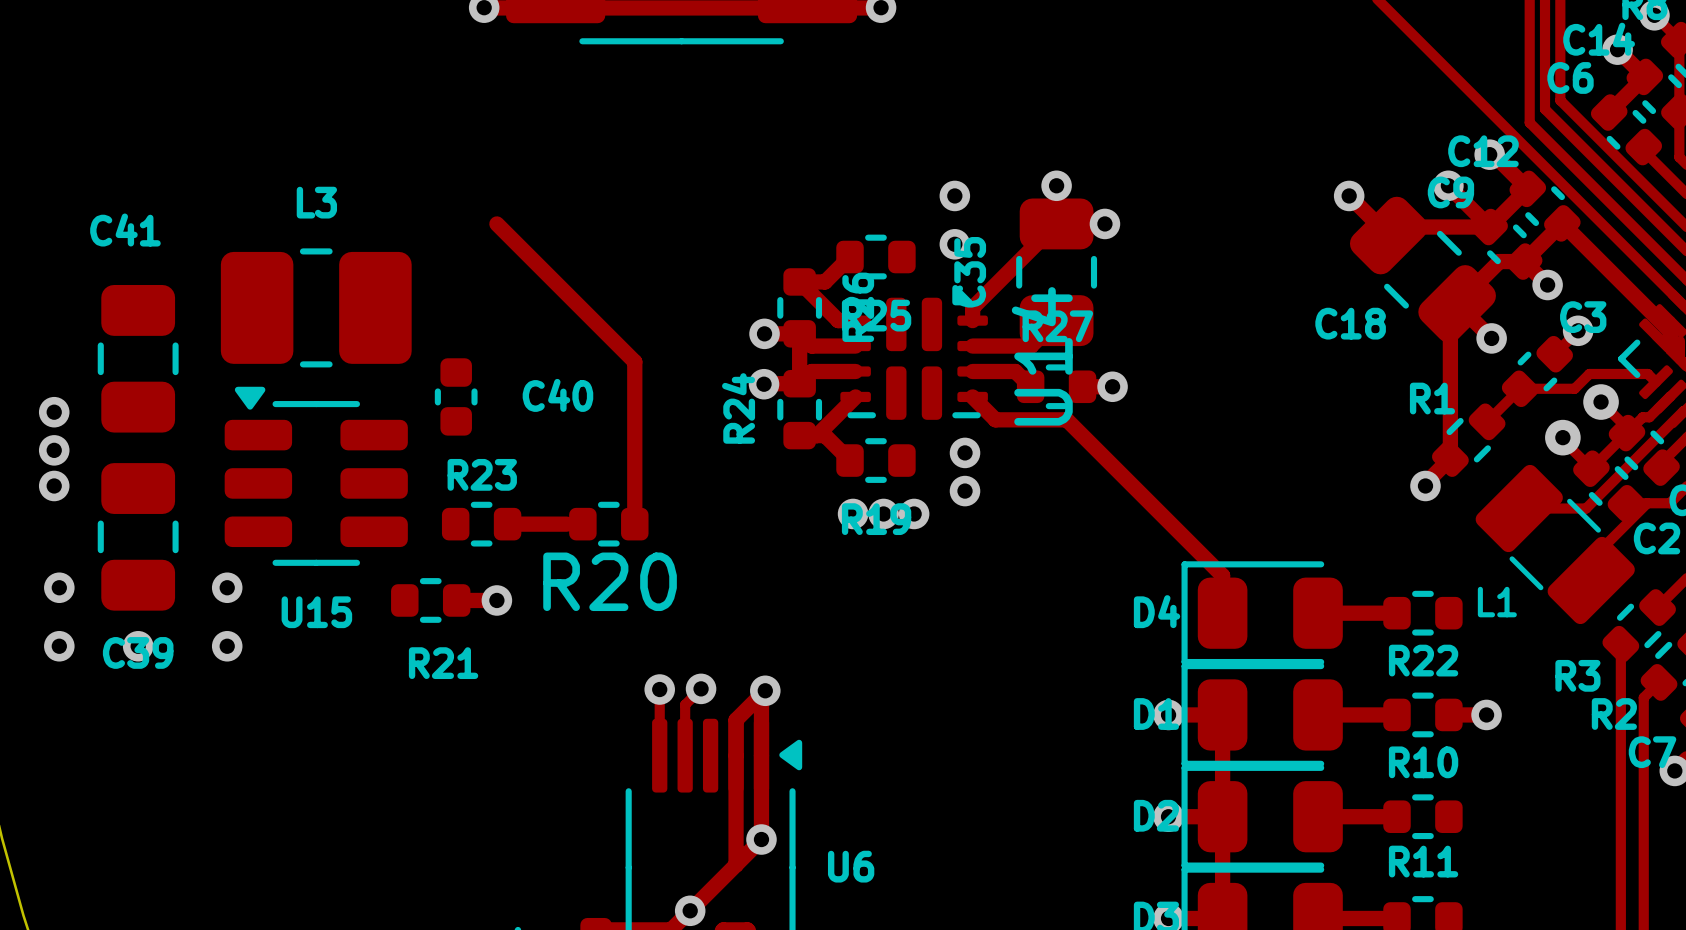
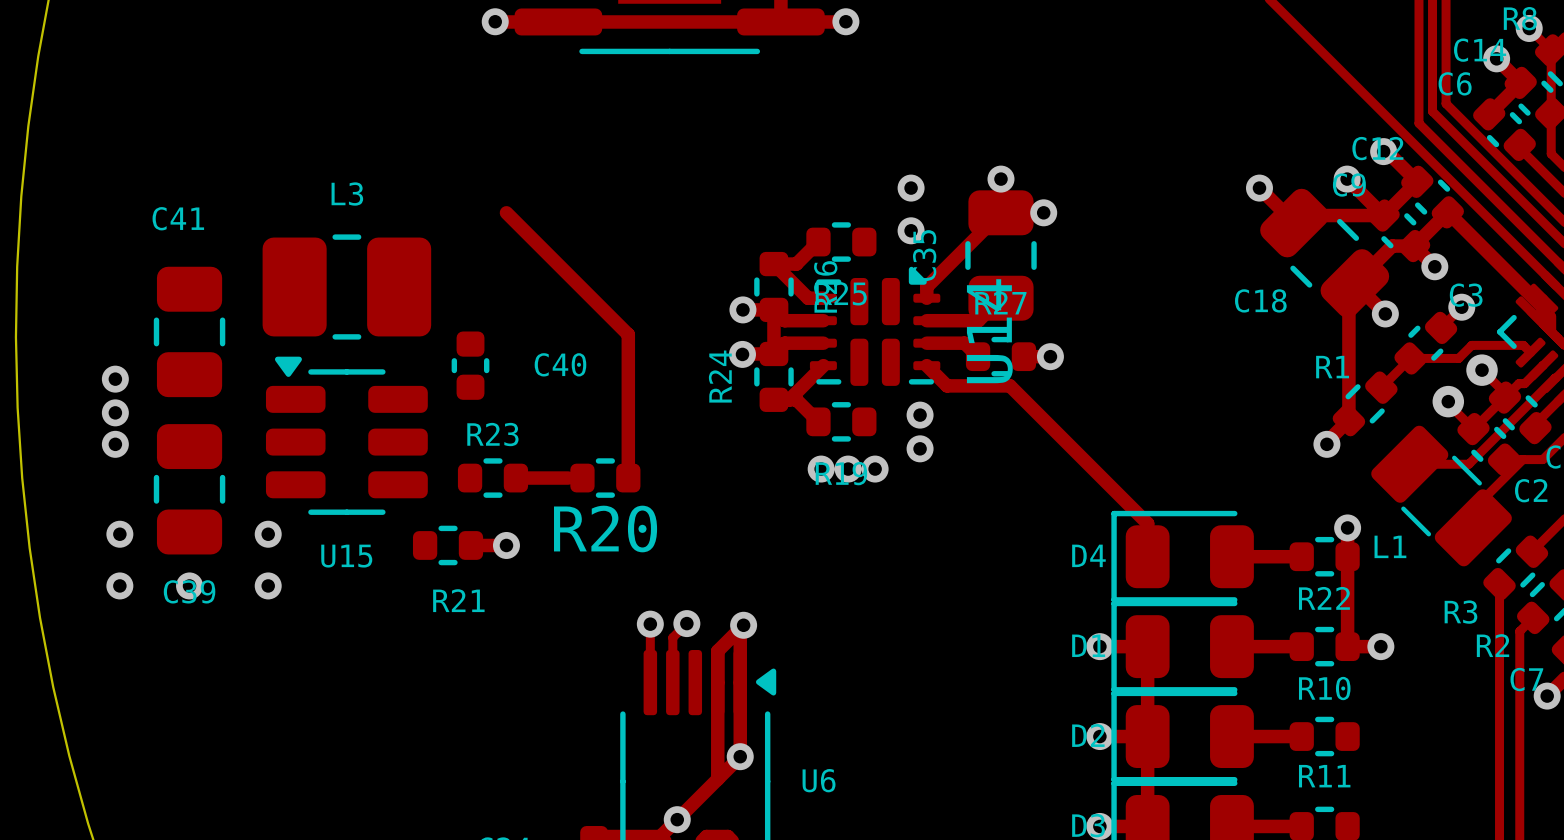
track: none -> (1347, 527) (1347, 646)
via: none -> (1347, 527)

